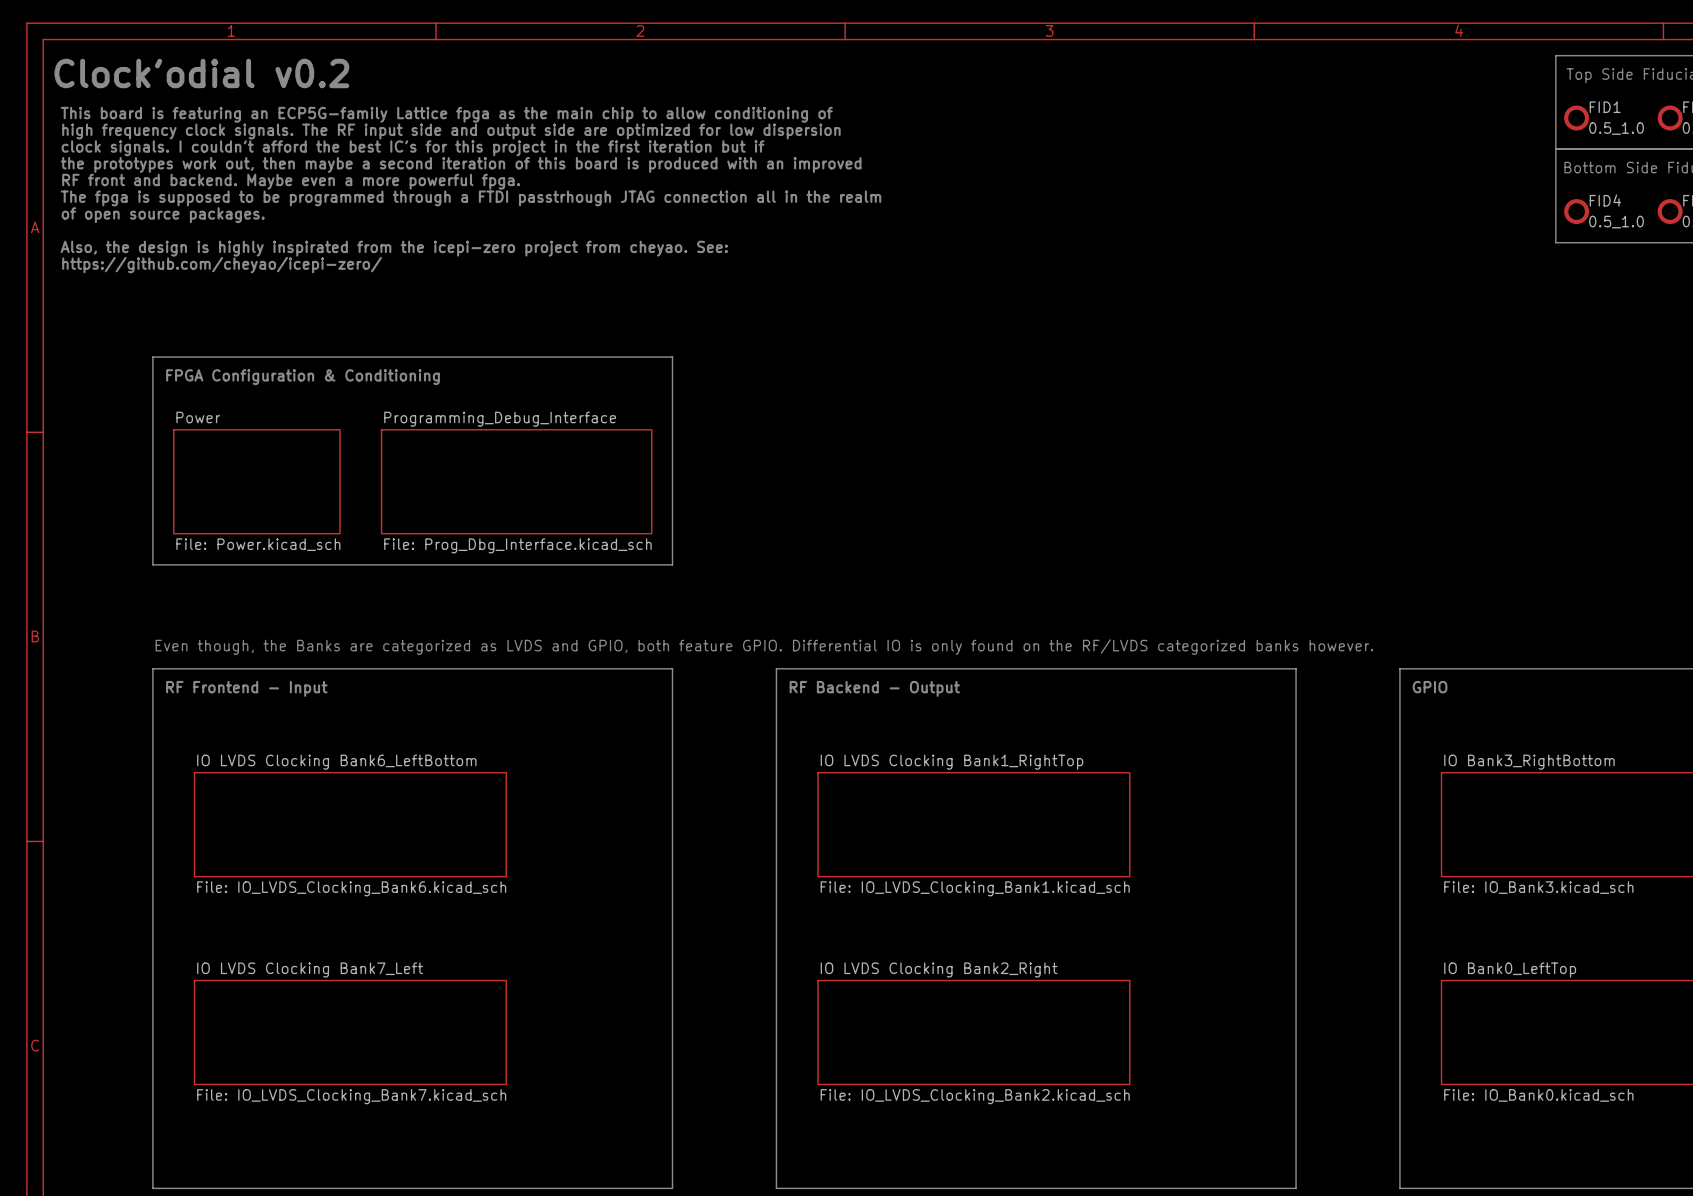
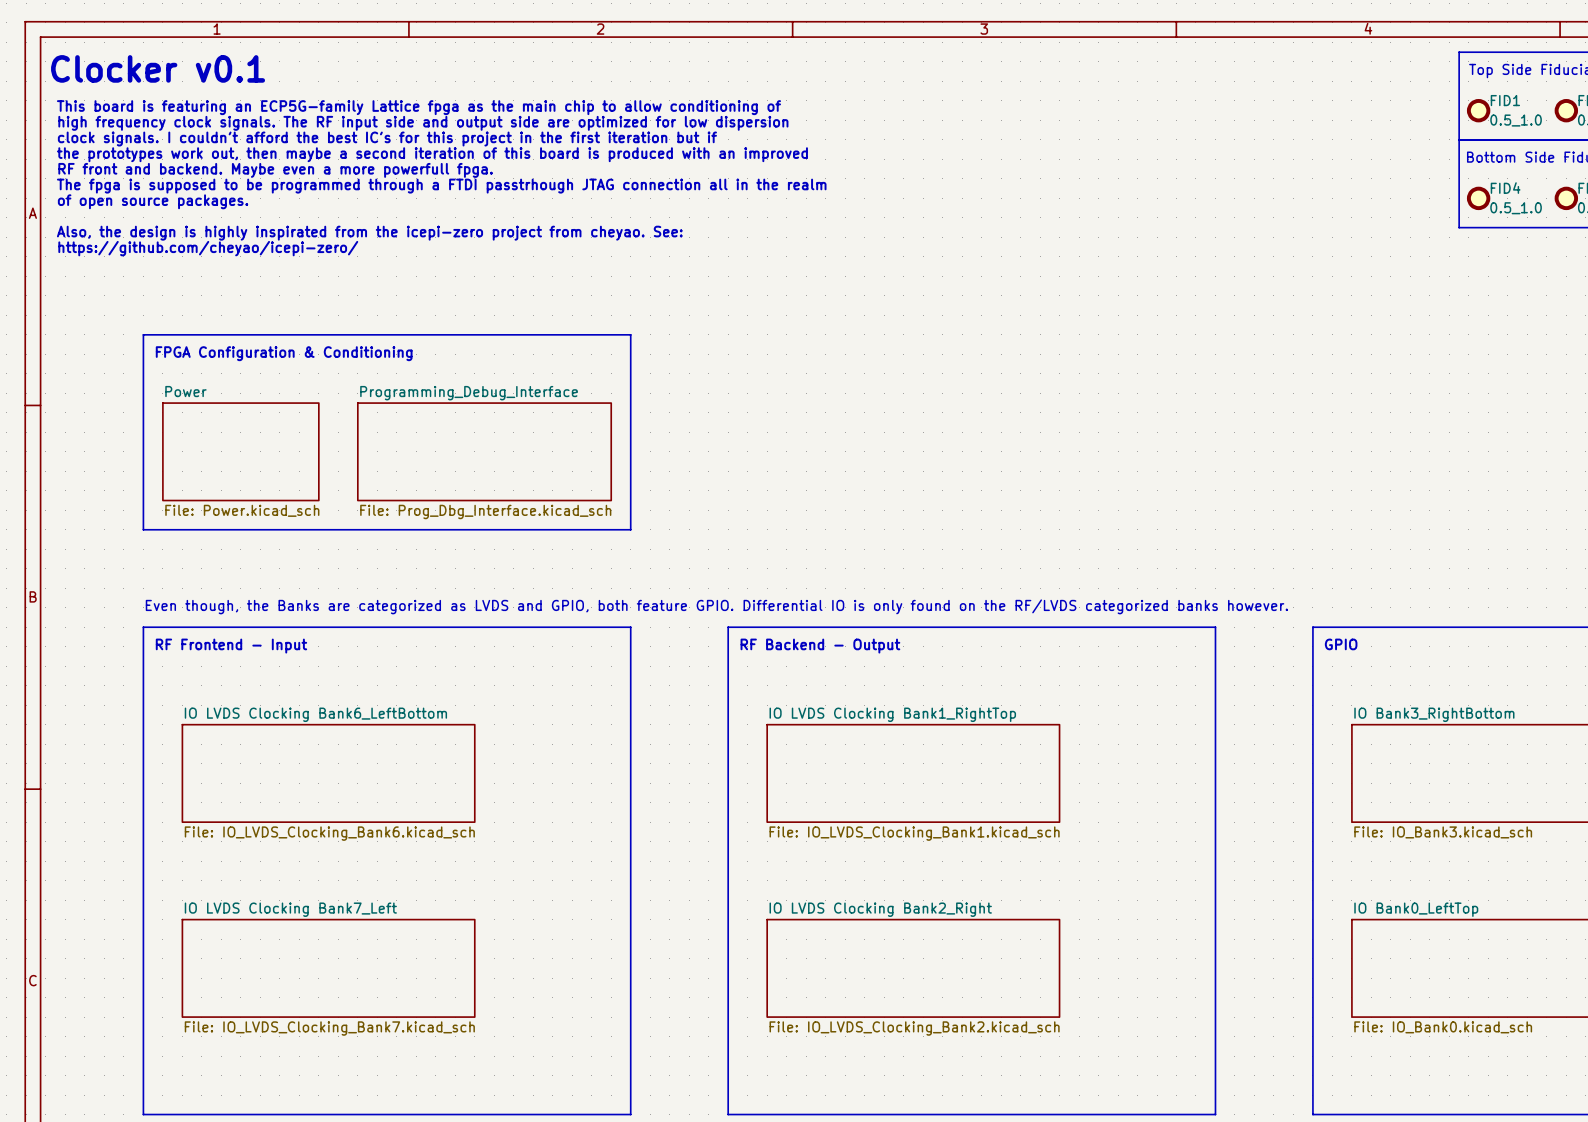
text: Clock'odial v0.2 (201, 73) -> Clocker v0.1 (158, 68)
text: RF front and backend. Maybe even a more powerful fpga. (291, 181) -> RF front and backend. Maybe even a more powerfull fpga. (275, 170)

